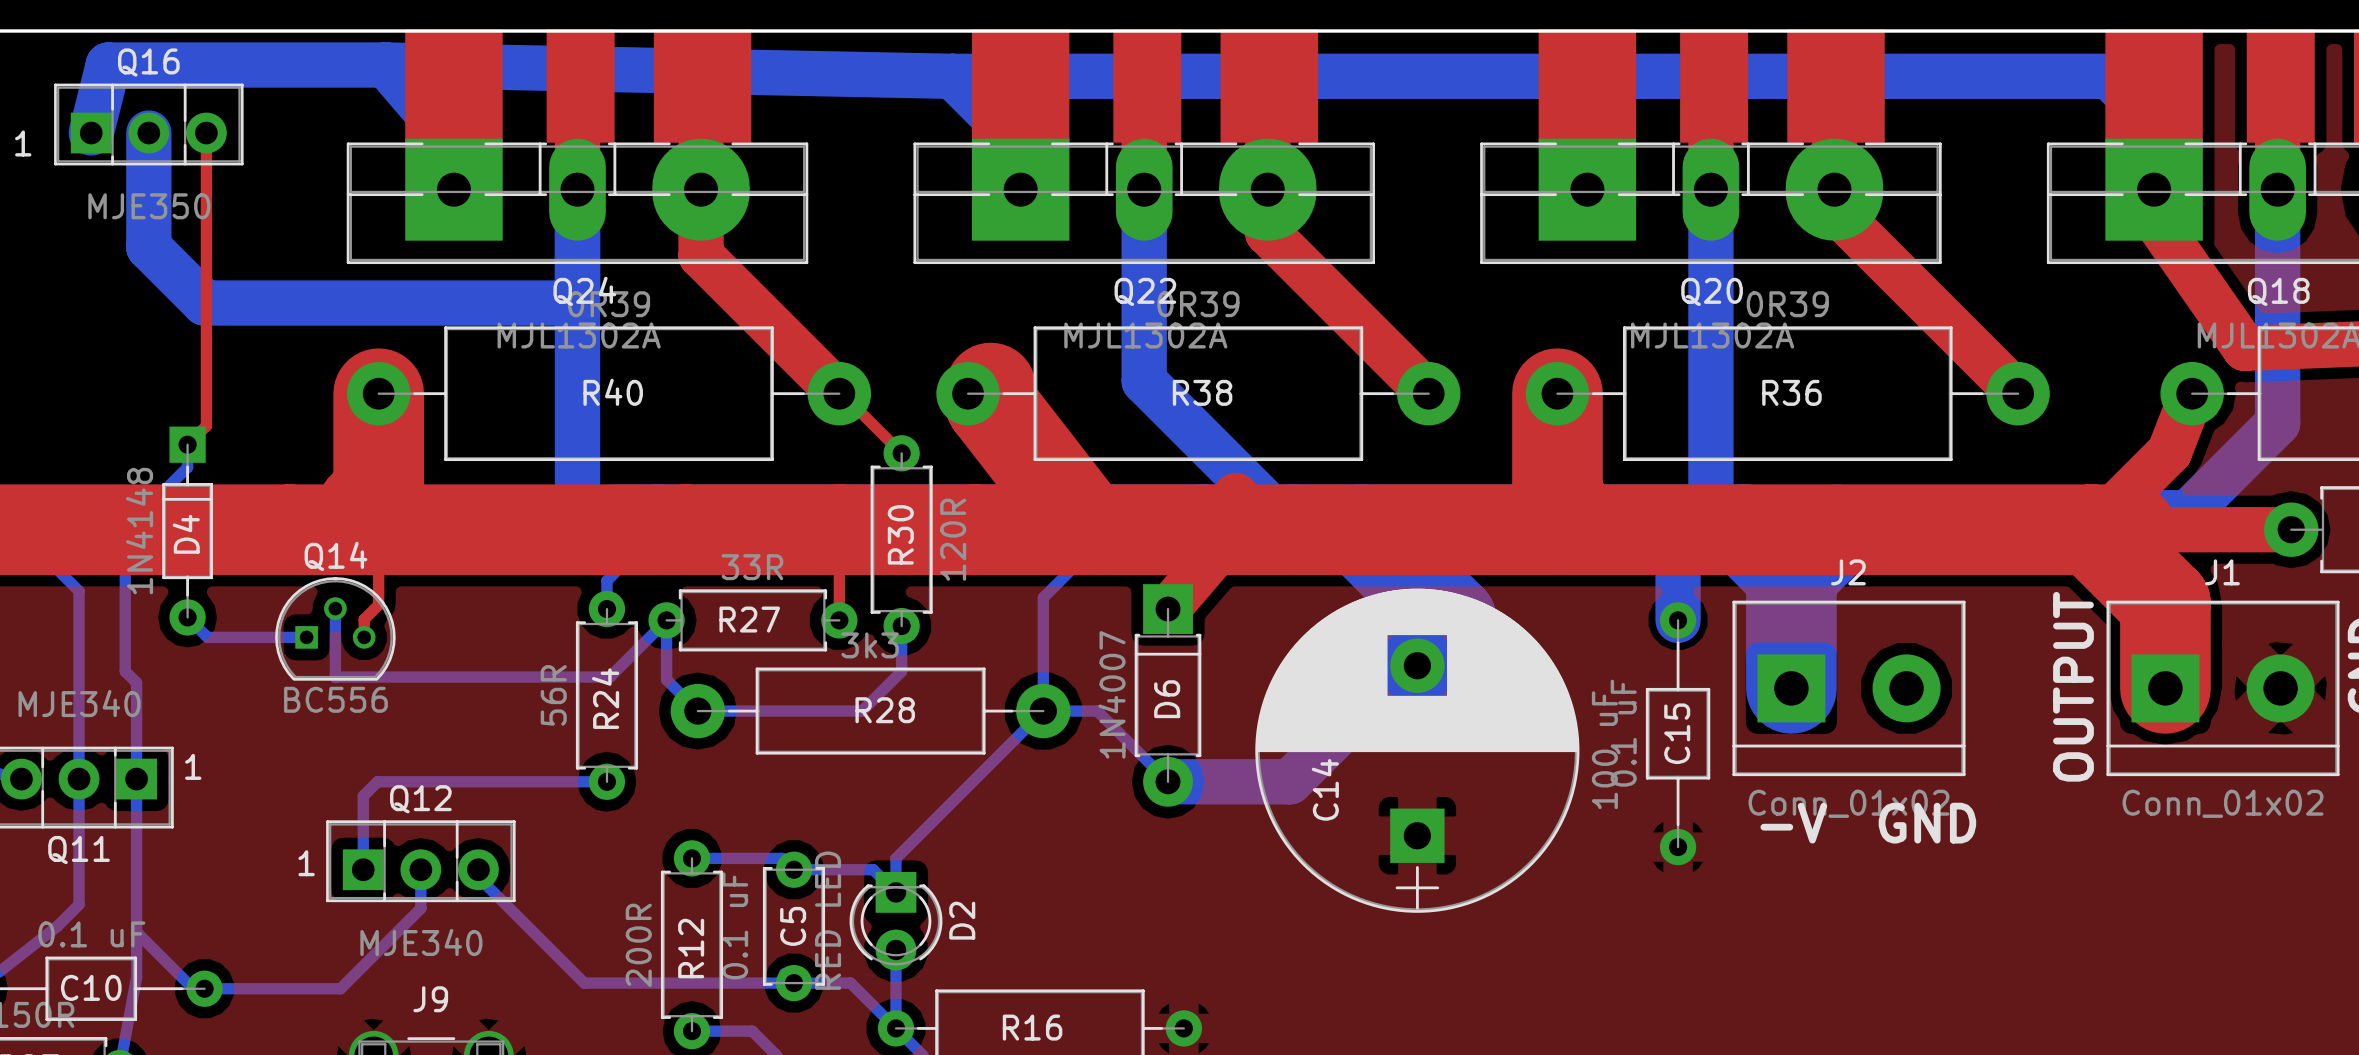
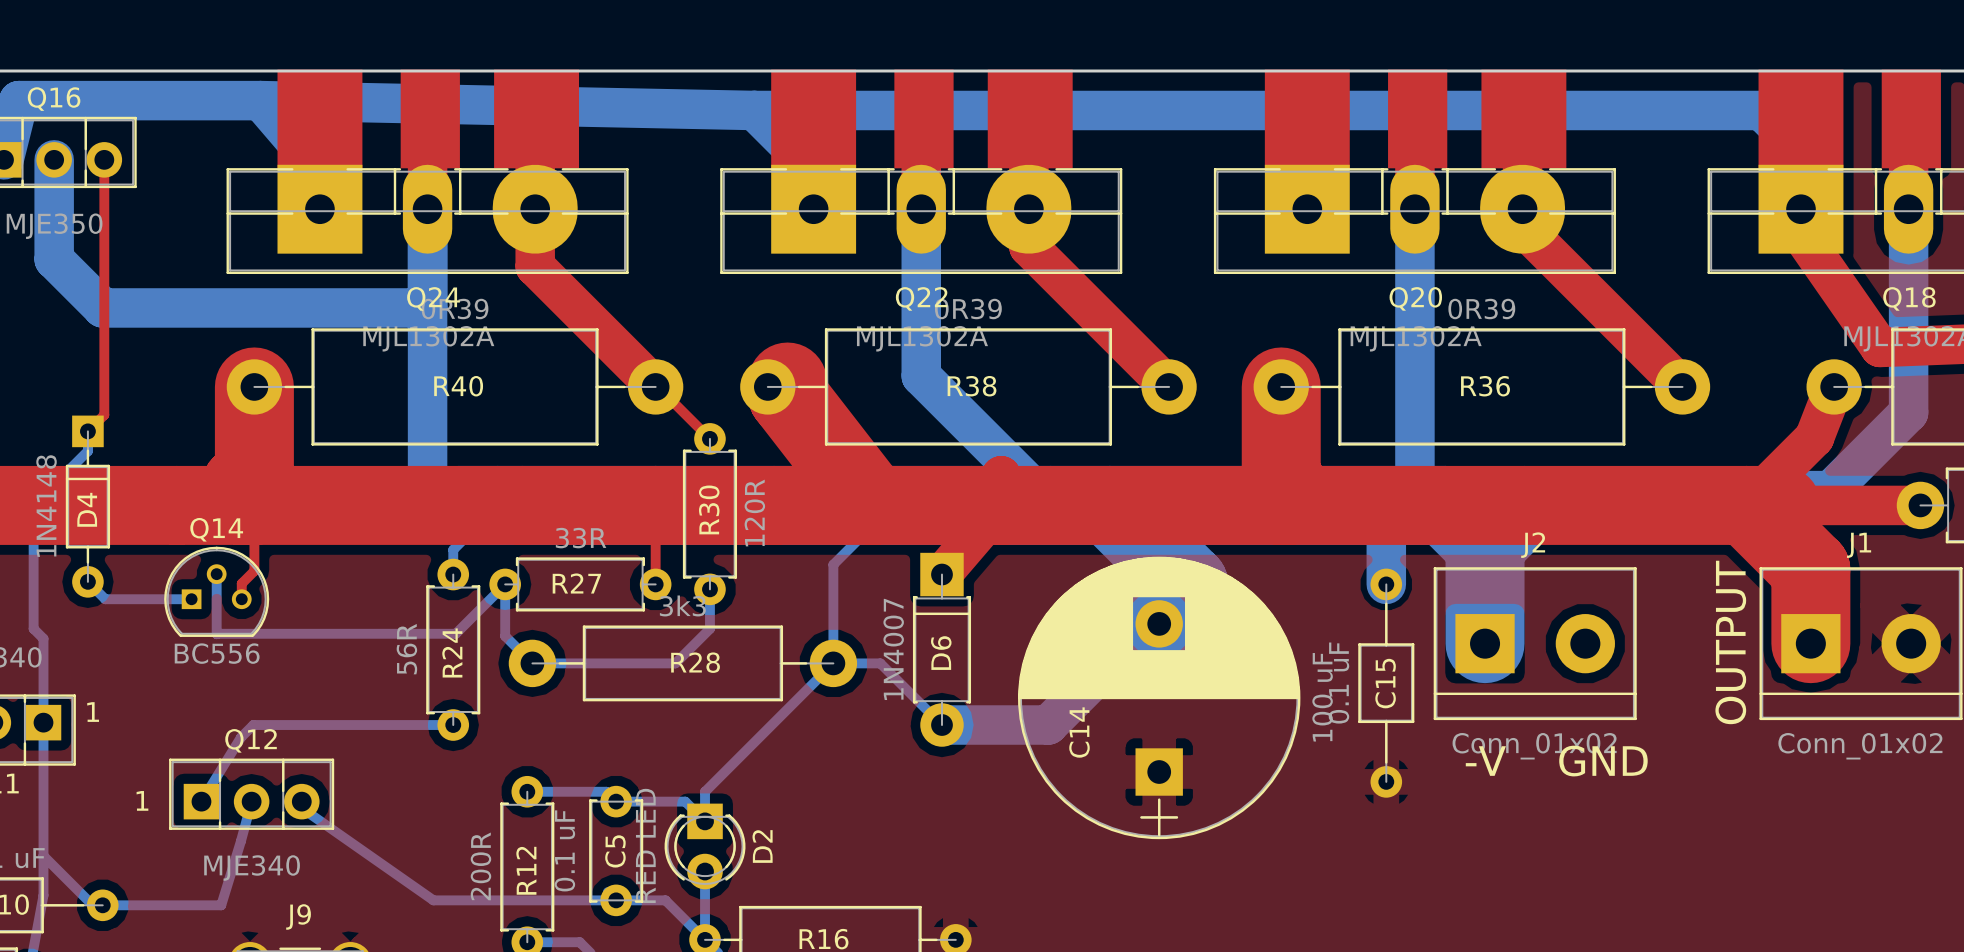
bottom track: (363, 796) (363, 869) -> (240, 737) (201, 801)
Q12 position: (420, 861) -> (251, 794)
text position: 1 (306, 863) -> 1 (142, 800)
bottom track: (420, 869) (420, 908) (340, 988) -> (251, 801) (221, 905)
bottom track: (478, 869) (478, 877) (584, 983) -> (301, 801) (301, 808) (433, 900)

